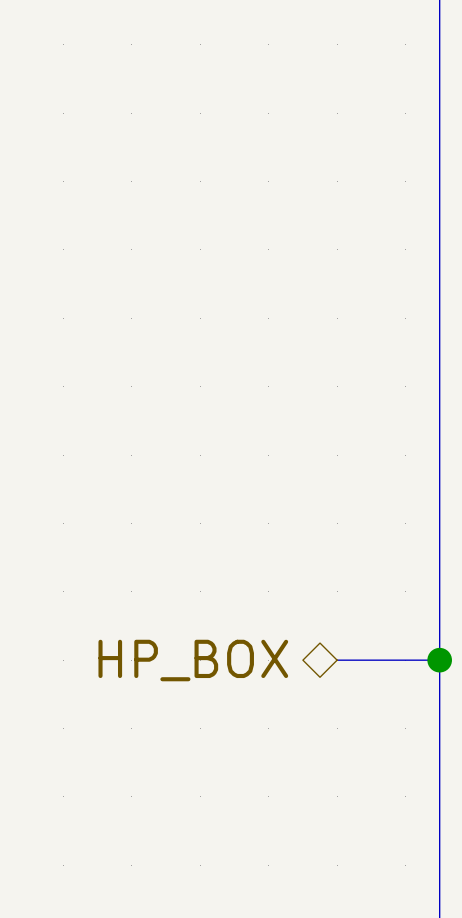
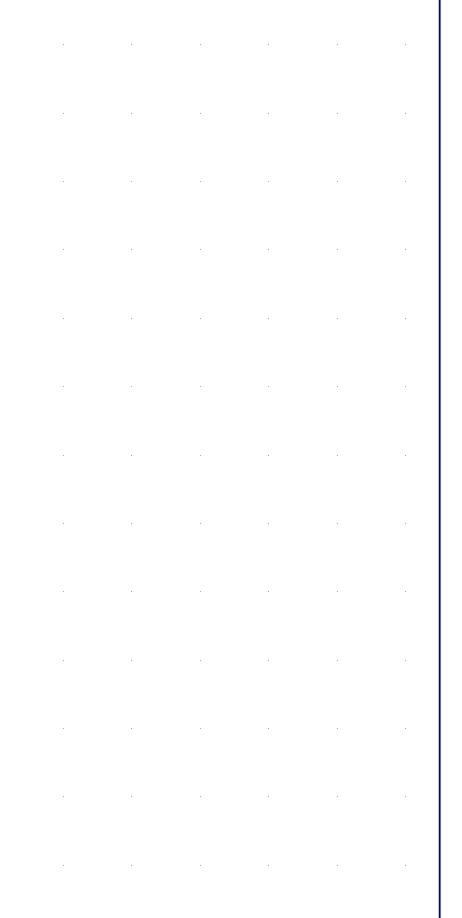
hierarchical label: HP_BOX (193, 660) -> none
bus: (337, 660) (439, 660) -> none
junction: (439, 660) -> none

